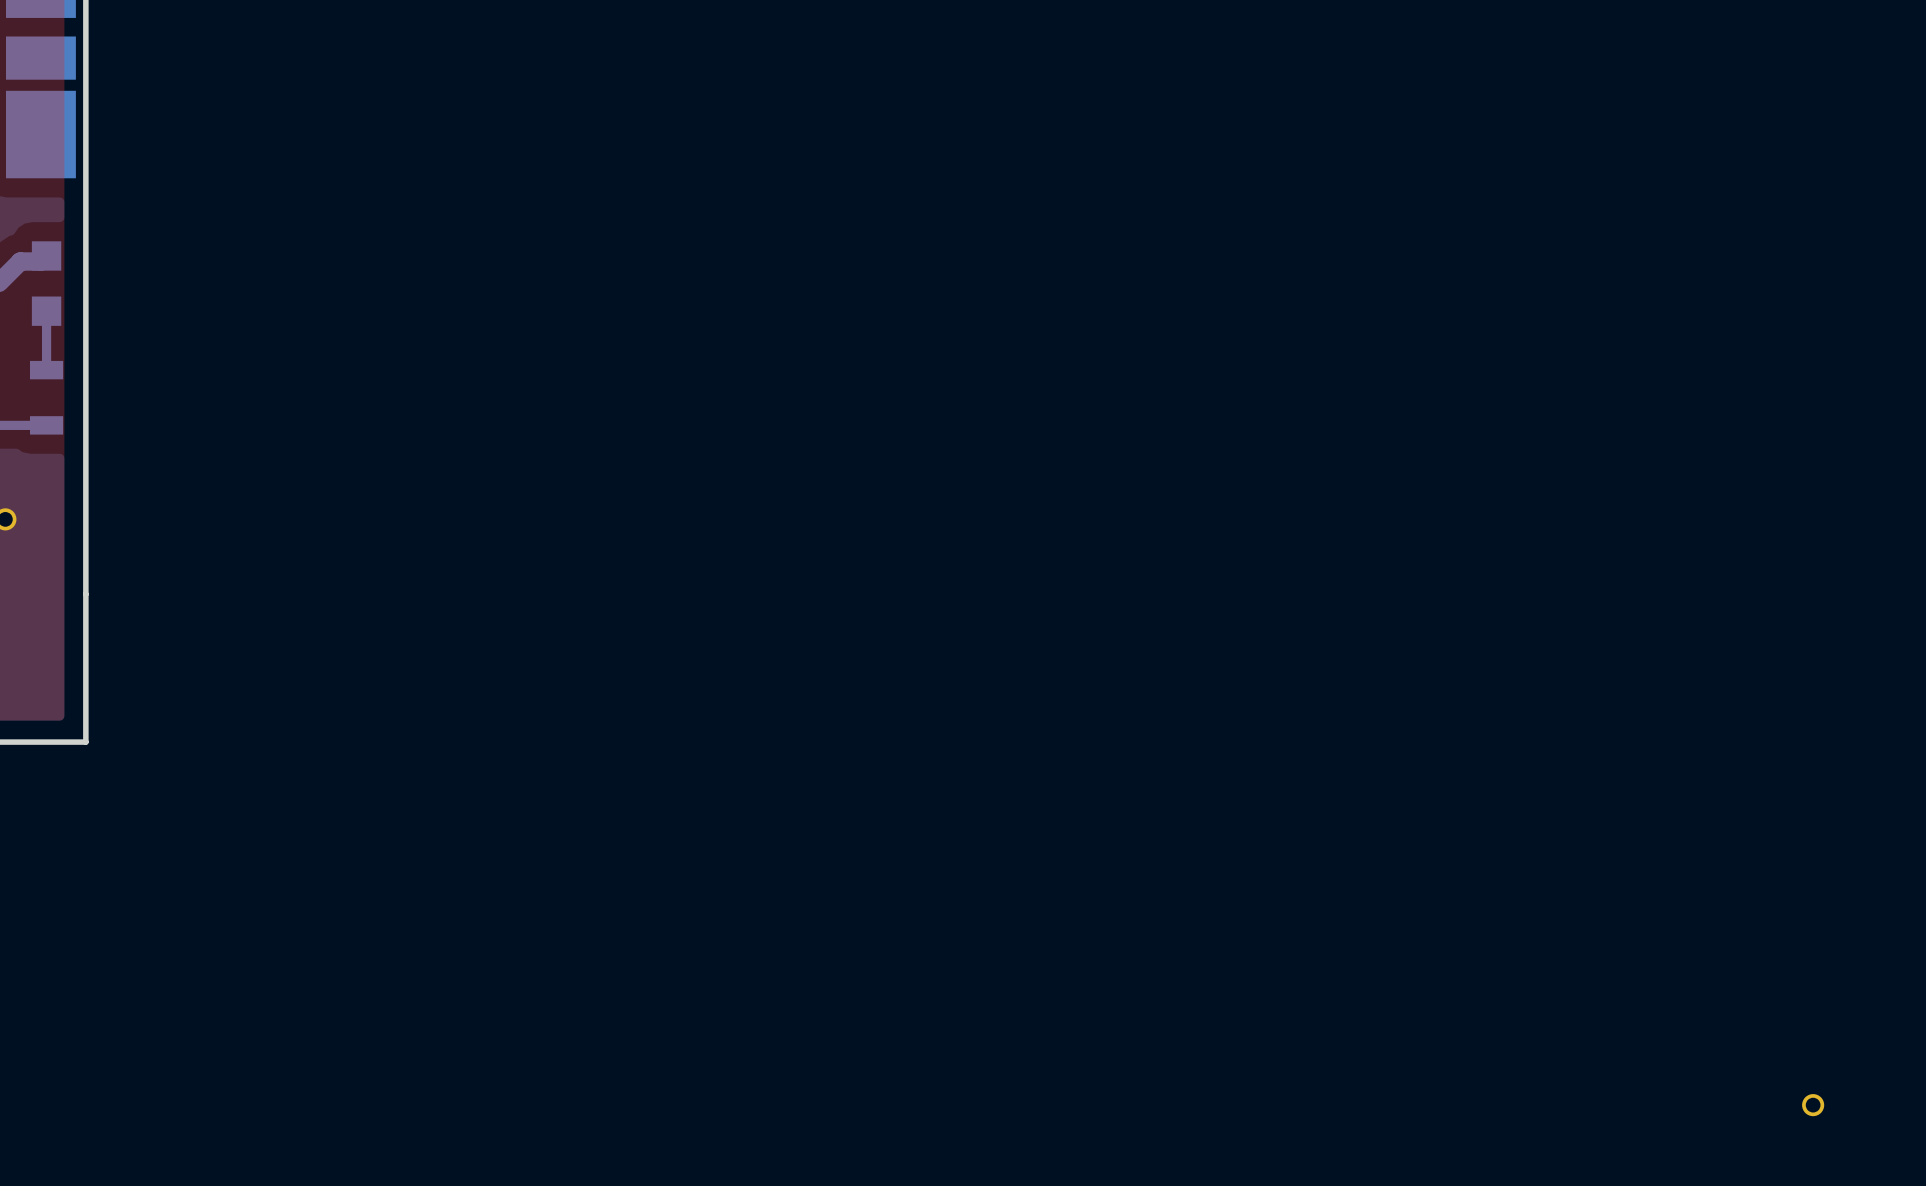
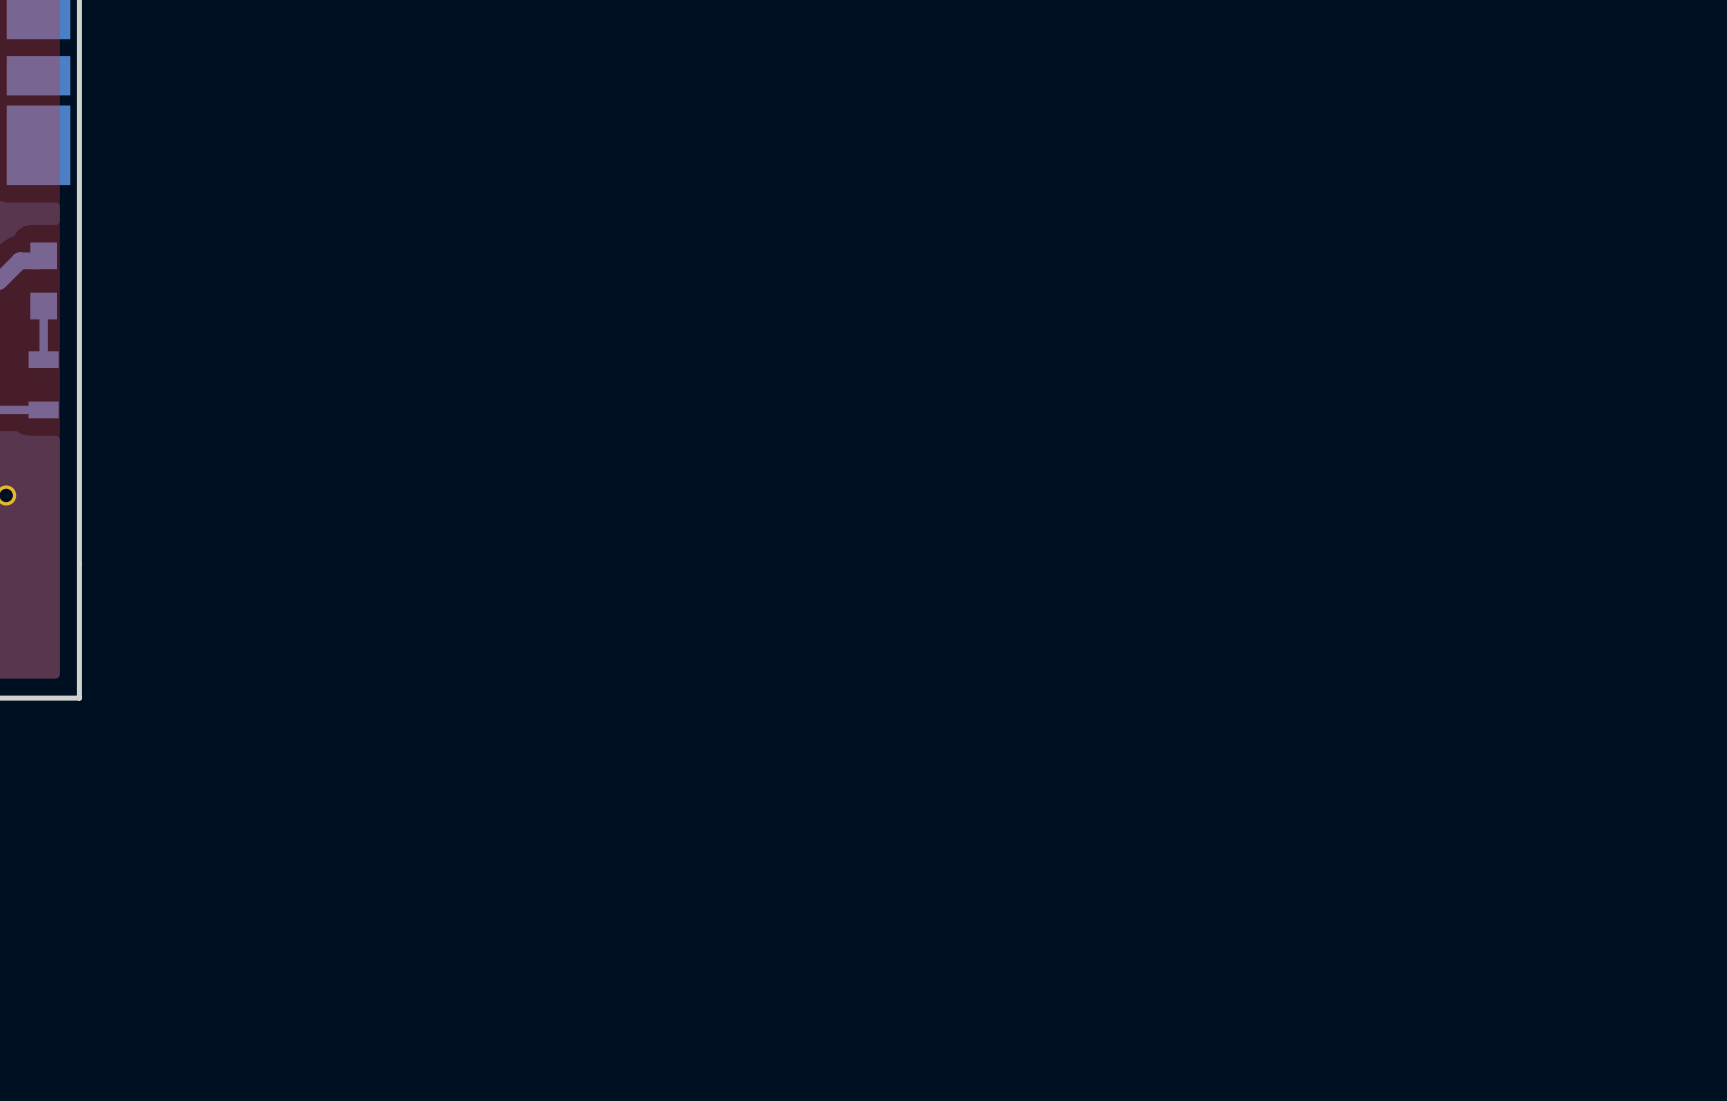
part: (1813, 1105) -> none

